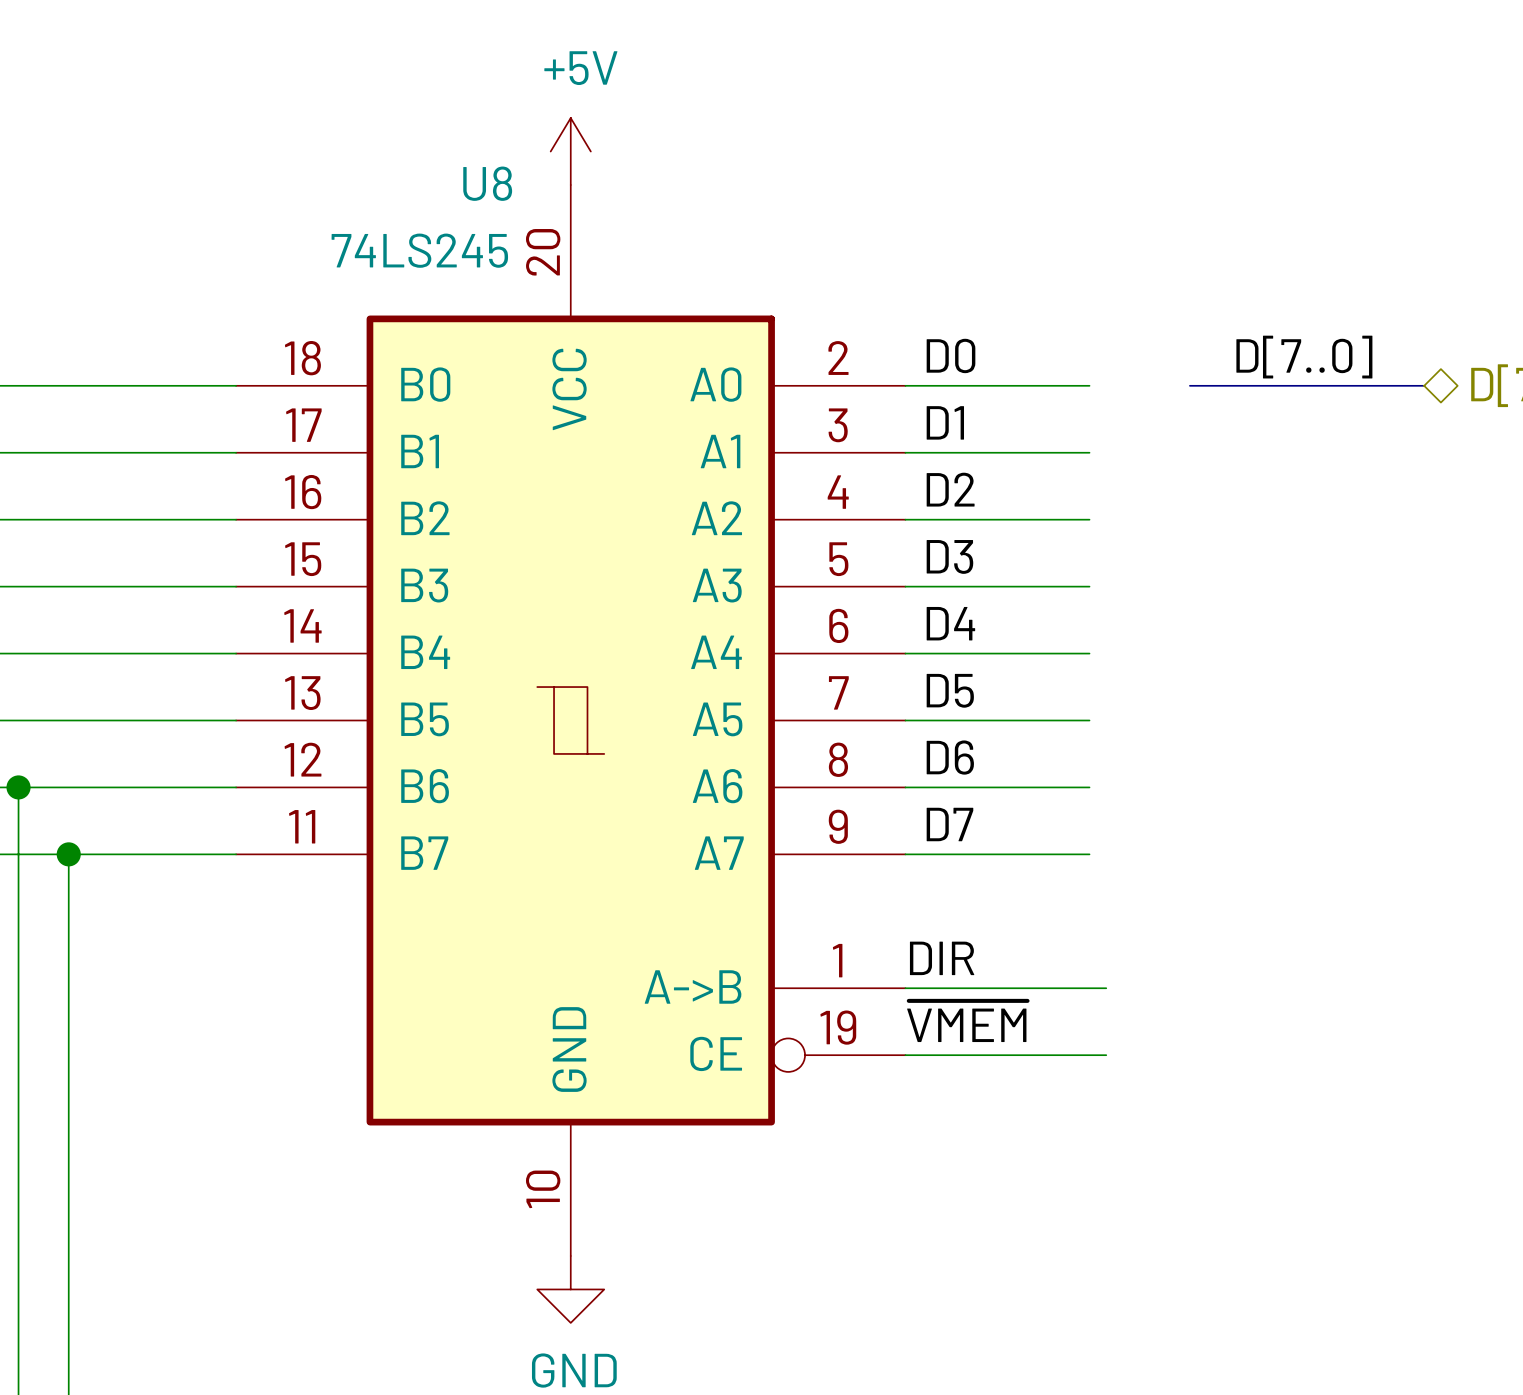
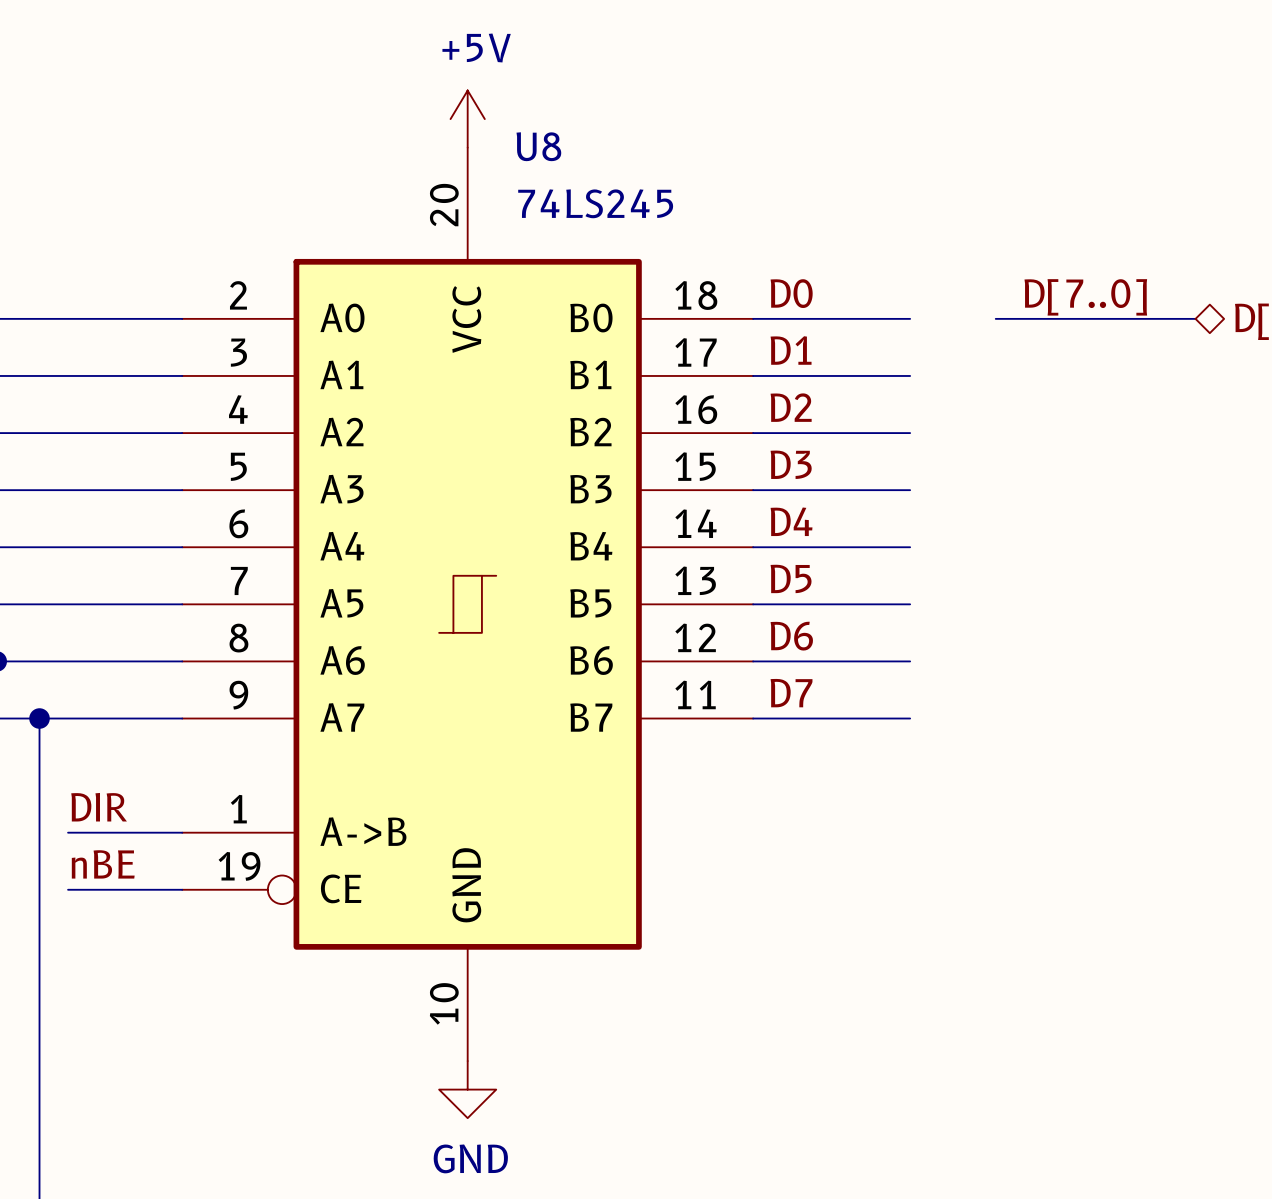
U8 flip: as is (570, 720) -> left-right (467, 604)
label: none -> DIR (99, 807)
label: DIR (942, 958) -> none
wire: none -> (68, 832) (182, 832)
wire: (905, 988) (1106, 988) -> none
label: ~{VMEM} (967, 1021) -> none
label: none -> nBE (103, 864)
wire: none -> (68, 889) (182, 889)
wire: (905, 1055) (1106, 1055) -> none

